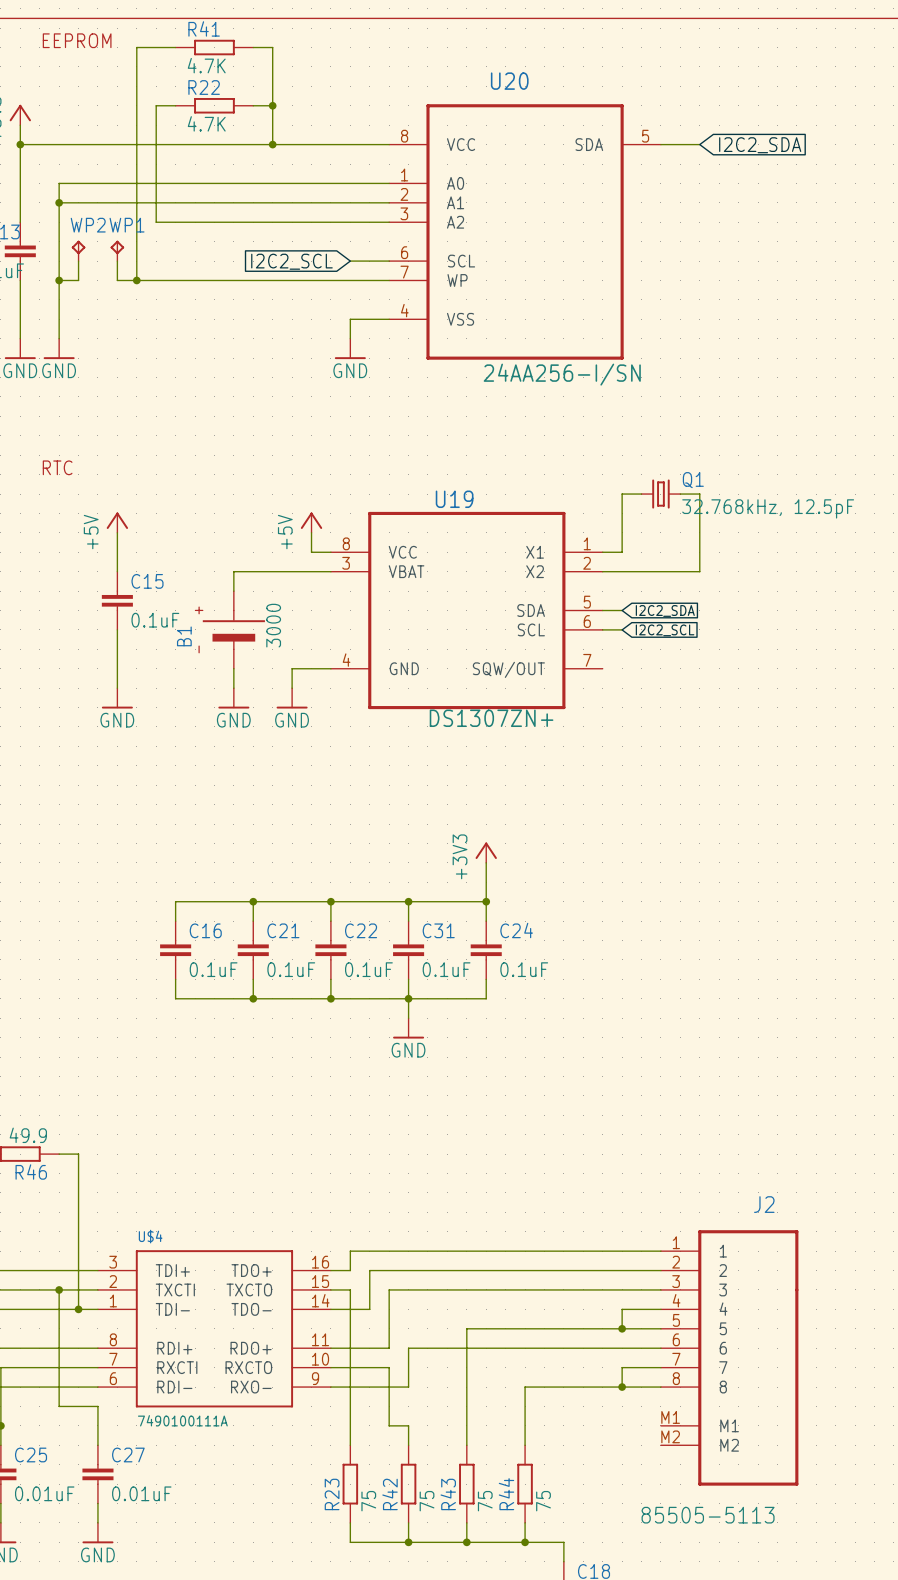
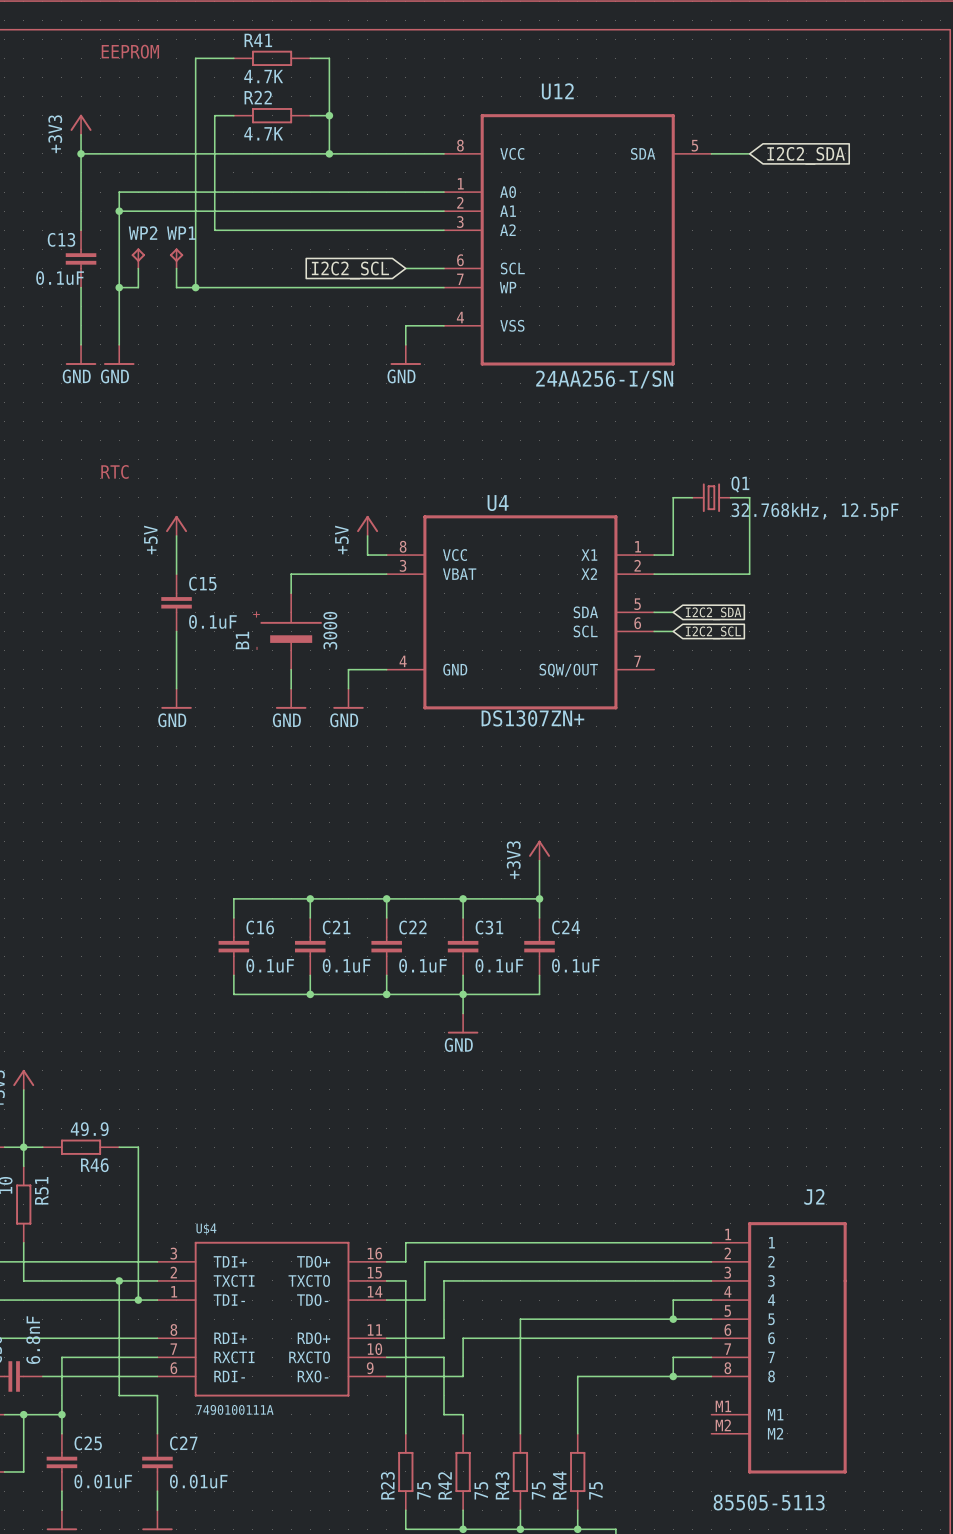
U20 name: U20 (509, 81) -> U12 (557, 91)
U19 name: U19 (454, 499) -> U4 (498, 503)

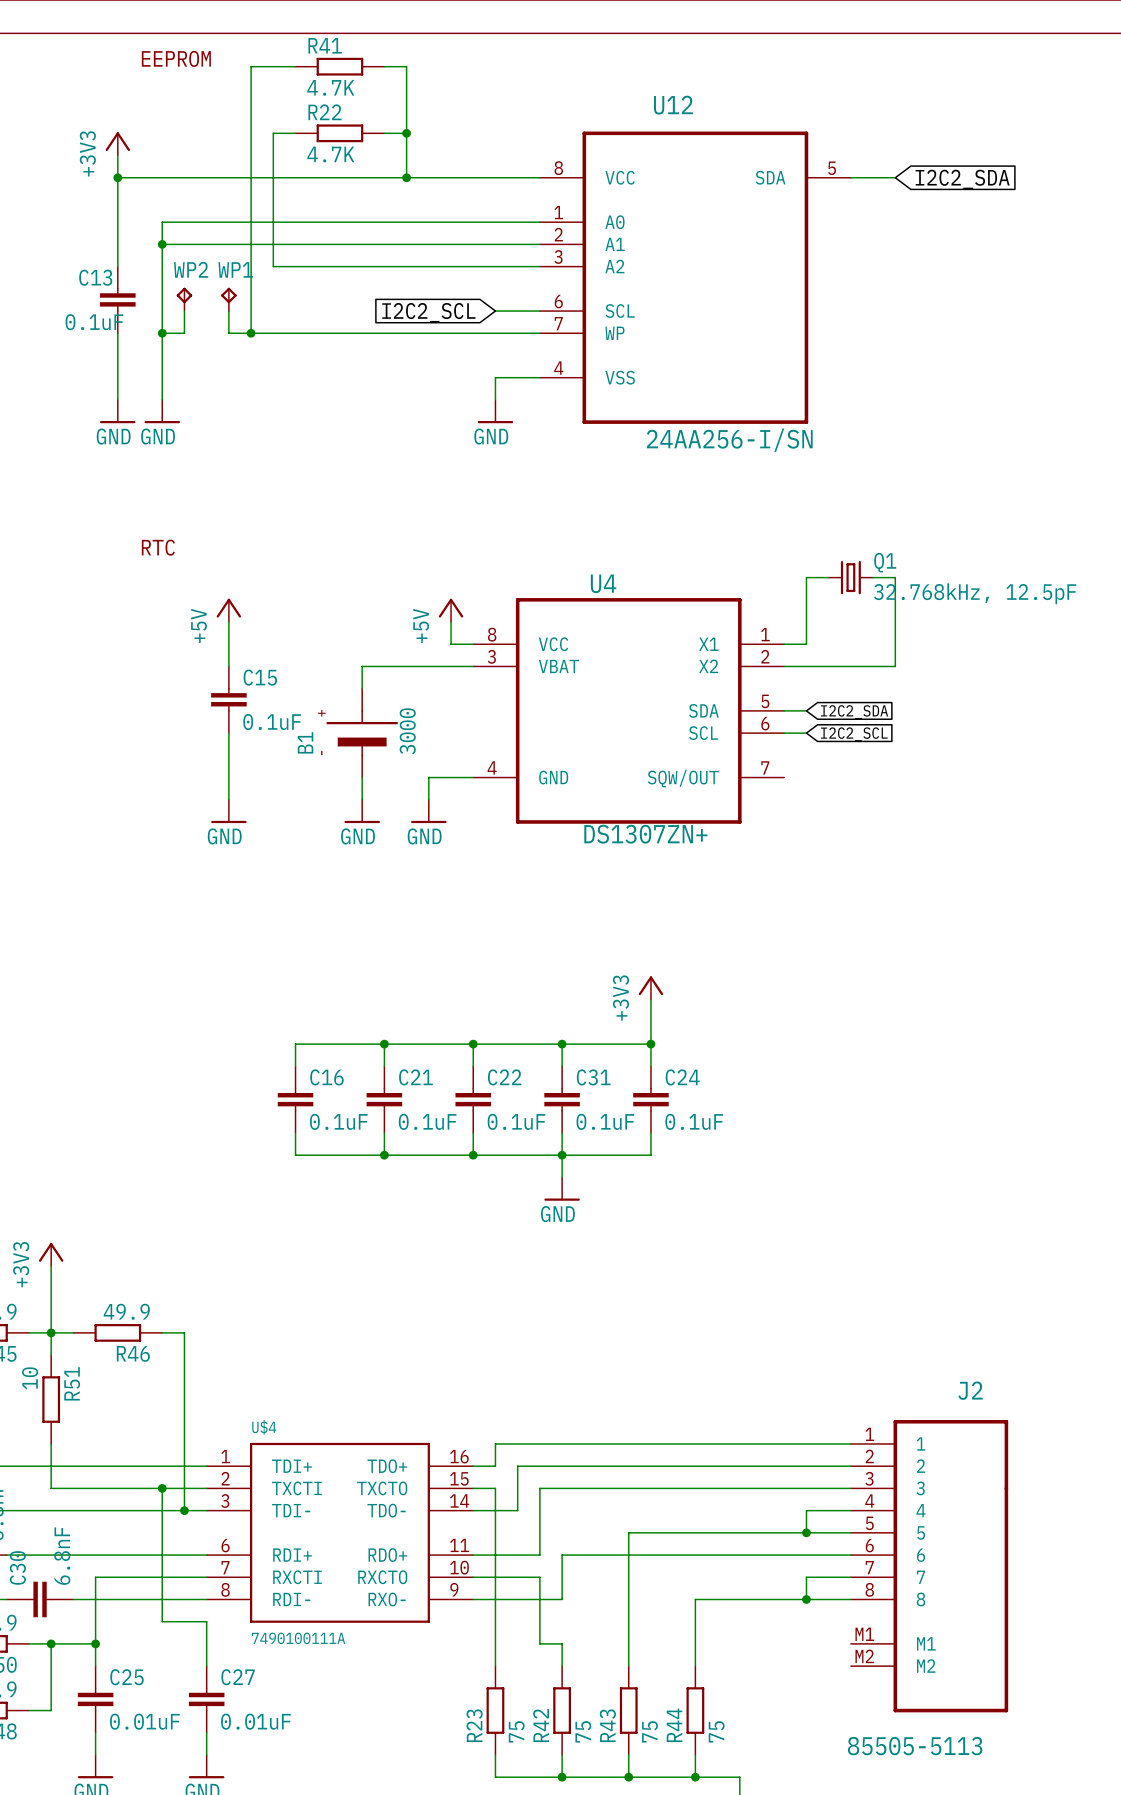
U$4 pin number: 3 (173, 1253) -> 1 (225, 1456)
U$4 pin number: 1 (174, 1291) -> 3 (225, 1501)
U$4 pin number: 8 (173, 1330) -> 6 (225, 1545)
U$4 pin number: 6 (173, 1368) -> 8 (225, 1589)

